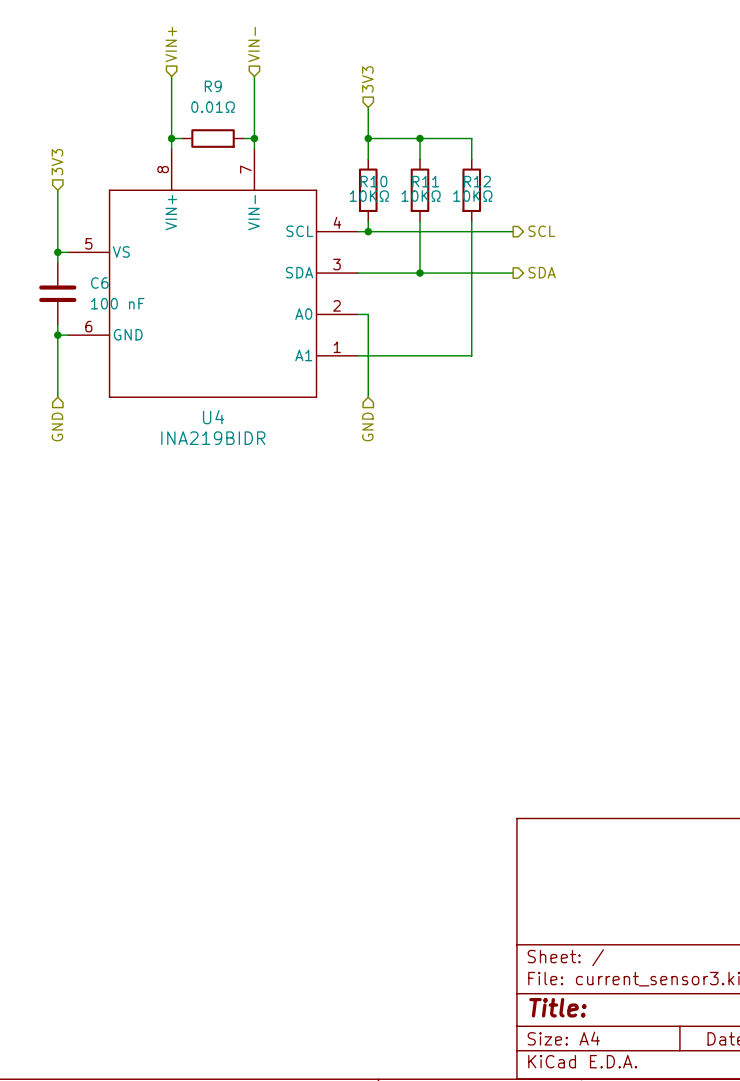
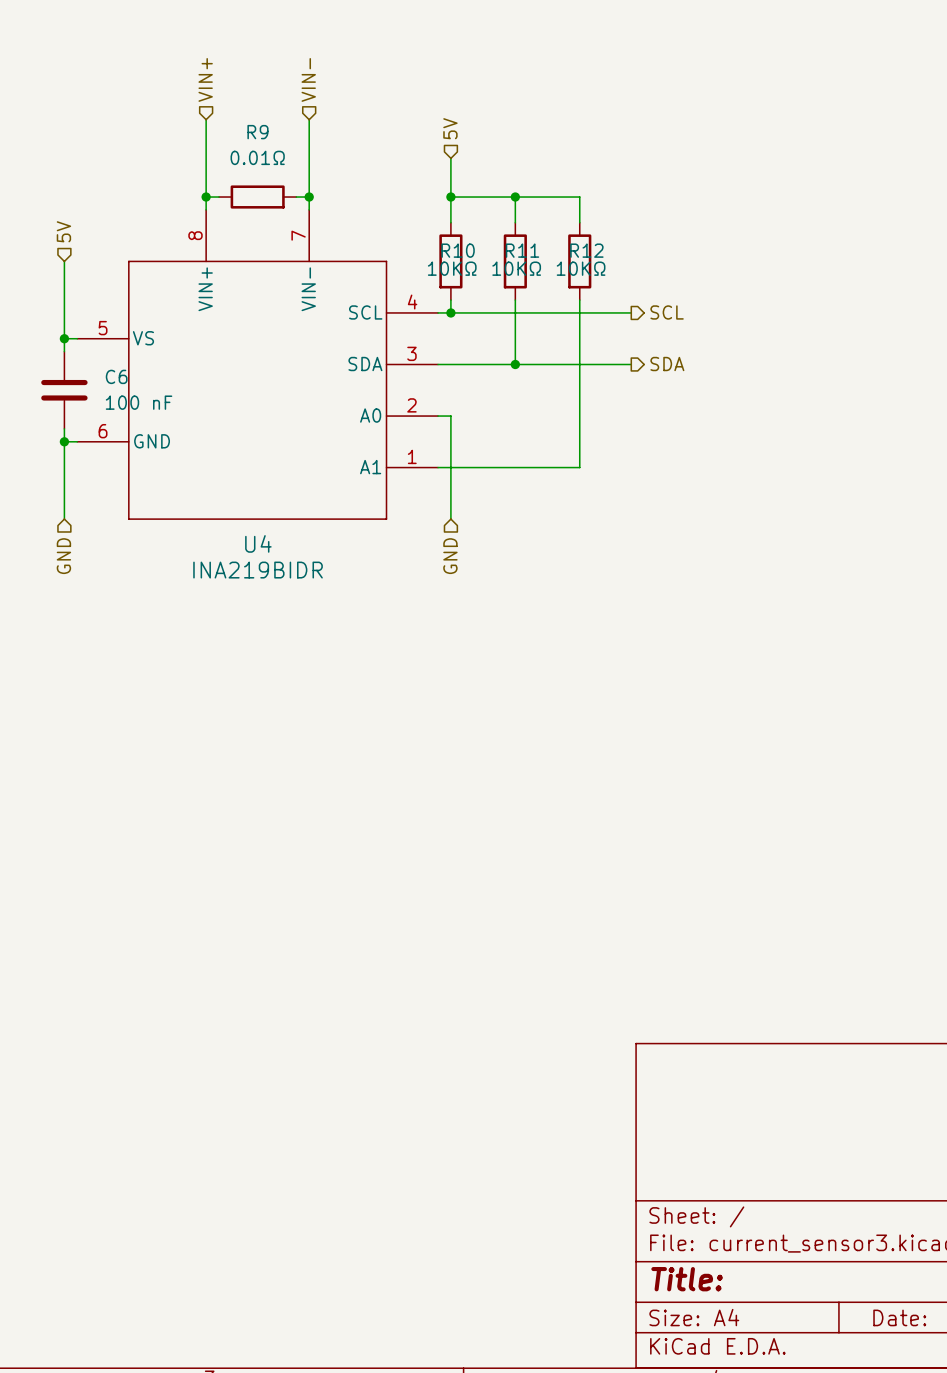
hierarchical label: 3V3 (367, 79) -> 5V (450, 128)
hierarchical label: 3V3 (57, 162) -> 5V (63, 231)

